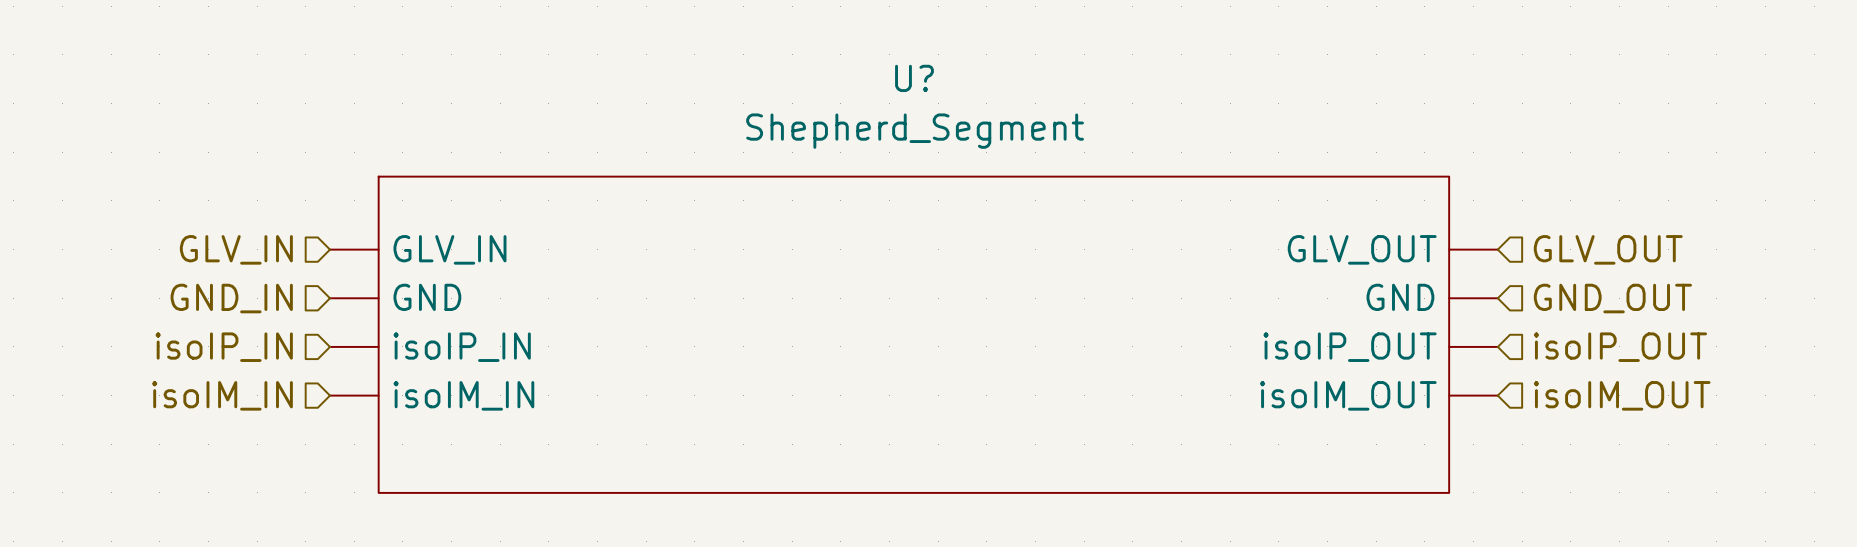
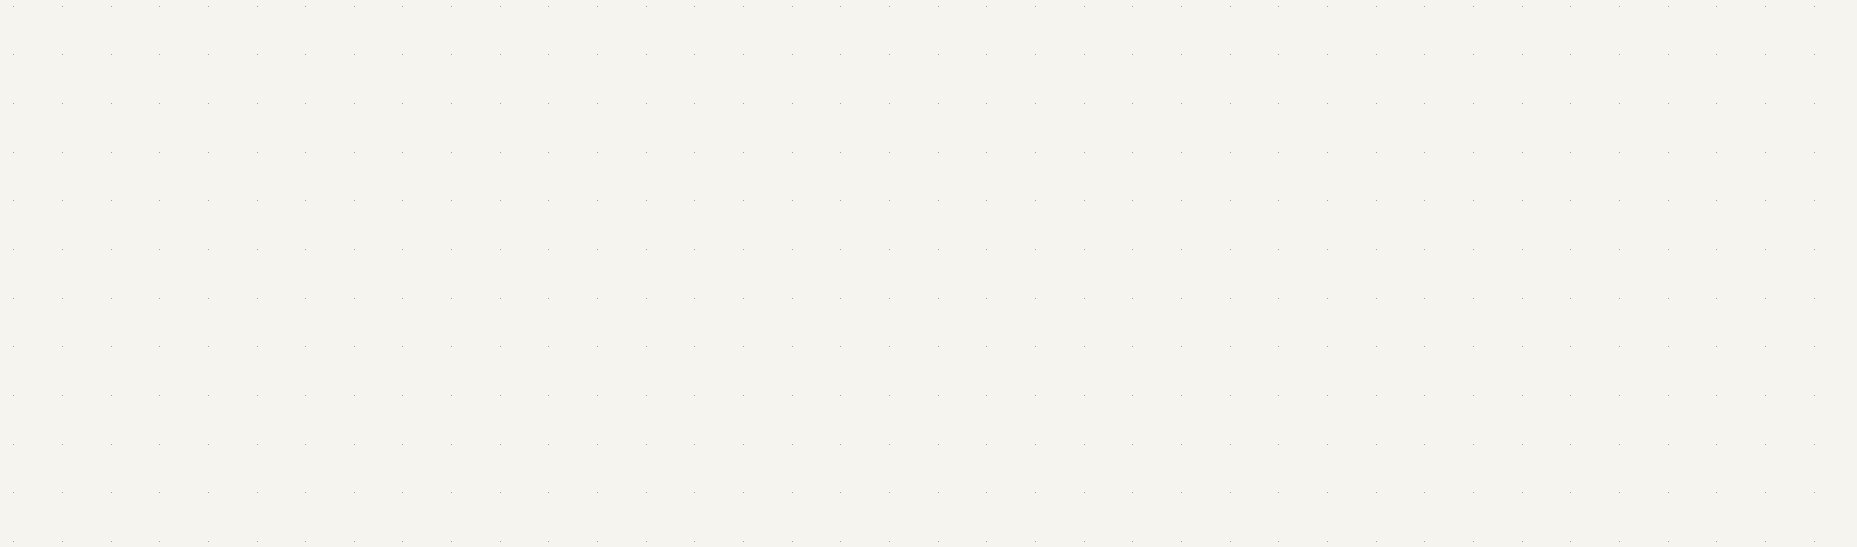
hierarchical label: GLV_IN (236, 249) -> none
hierarchical label: GLV_OUT (1608, 249) -> none
hierarchical label: GND_IN (231, 298) -> none
hierarchical label: GND_OUT (1612, 298) -> none
U?: Shepherd_Segment (913, 334) -> none
hierarchical label: isoIP_IN (224, 347) -> none
hierarchical label: isoIP_OUT (1620, 347) -> none
hierarchical label: isoIM_IN (222, 395) -> none
hierarchical label: isoIM_OUT (1622, 395) -> none

